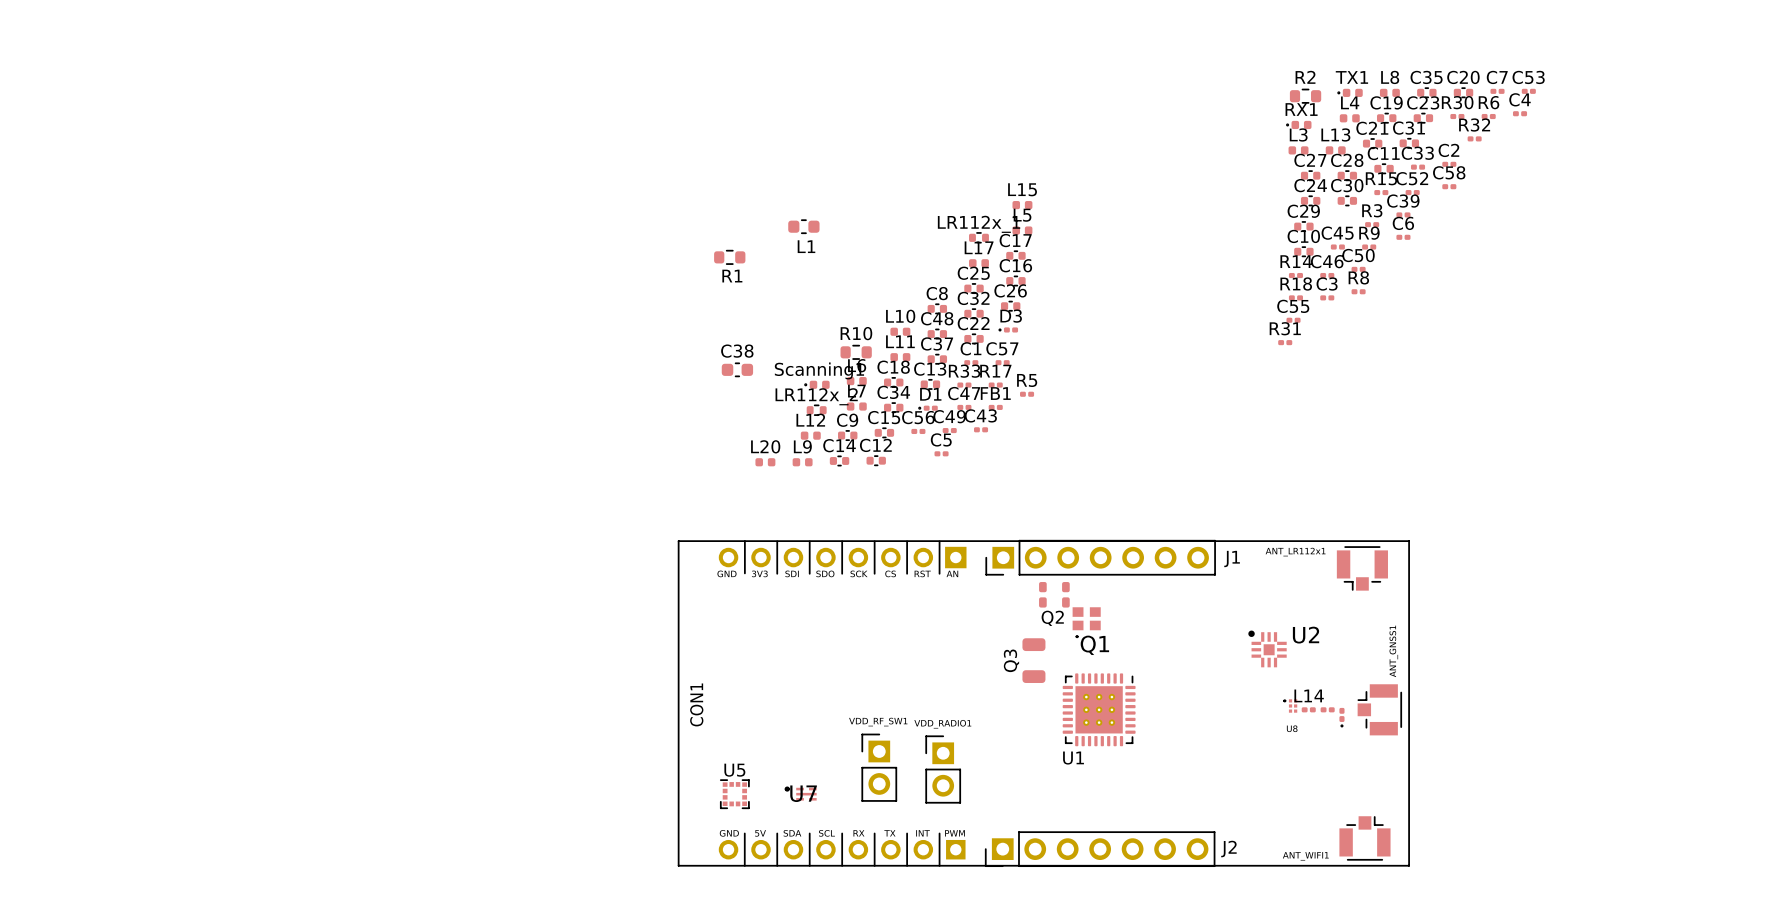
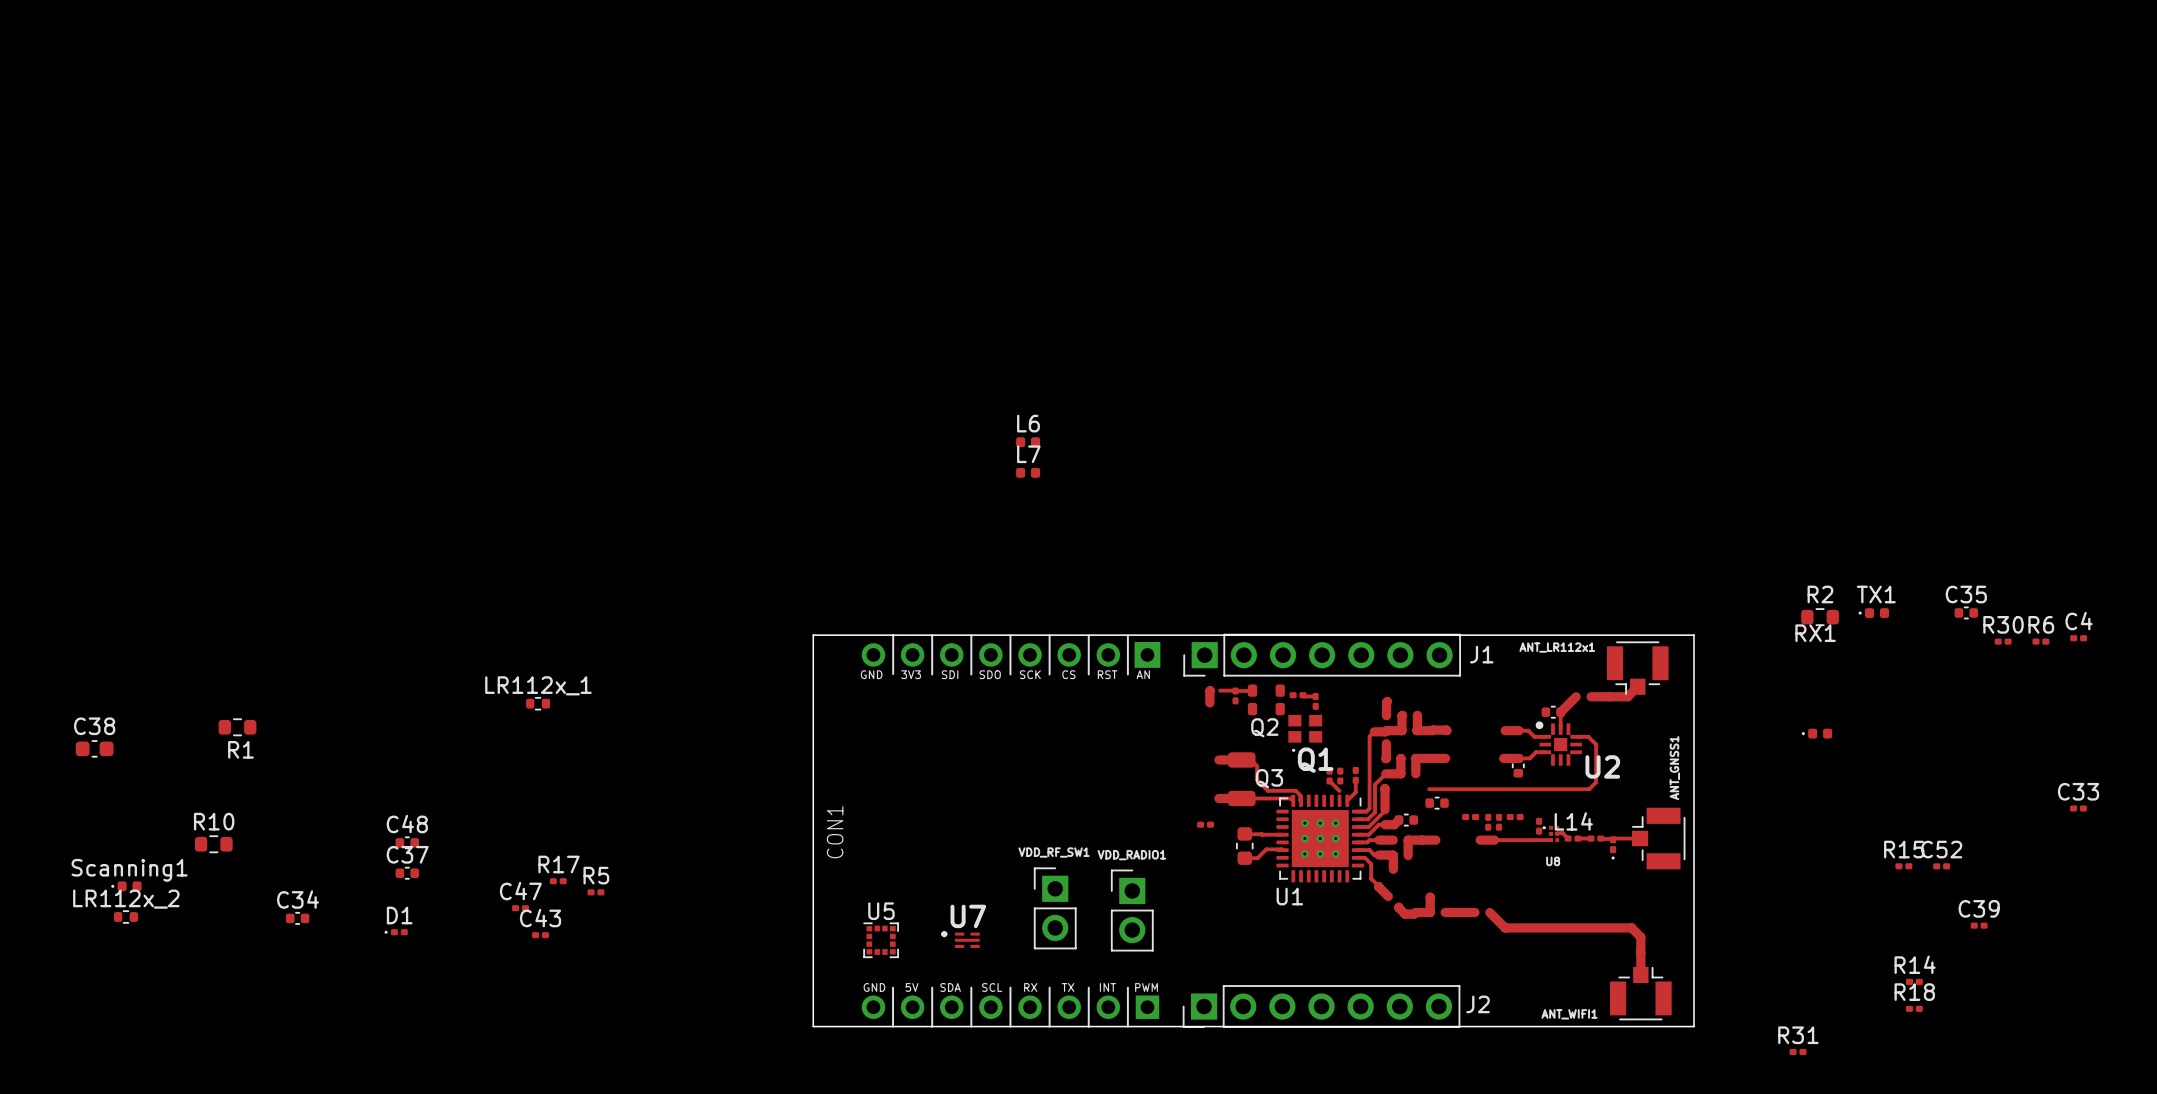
C7: (1497, 91) -> none
C53: (1528, 91) -> none
TX1 position: (1350, 92) -> (1873, 613)
L8: (1389, 92) -> none
C35 position: (1426, 92) -> (1966, 612)
C20: (1463, 92) -> none
R2 position: (1305, 96) -> (1820, 617)
RX1 name position: RX1 (1301, 109) -> RX1 (1815, 633)
C4 position: (1520, 113) -> (2078, 638)
R30 position: (1457, 116) -> (2003, 641)
R6 position: (1488, 116) -> (2040, 641)
L4: (1349, 118) -> none
C19: (1386, 118) -> none
C23: (1423, 118) -> none
RX1 position: (1298, 124) -> (1816, 733)
R32: (1474, 138) -> none
C21: (1372, 143) -> none
C31: (1409, 143) -> none
L3: (1298, 150) -> none
L13: (1335, 150) -> none
C2: (1449, 164) -> none
C33 position: (1418, 167) -> (2078, 808)
C11: (1384, 168) -> none
C27: (1310, 175) -> none
C28: (1347, 175) -> none
C58: (1449, 186) -> none
R15 position: (1381, 192) -> (1903, 866)
C52 position: (1412, 192) -> (1941, 866)
C24: (1310, 200) -> none
C30: (1347, 200) -> none
L15: (1022, 205) -> none
C39 position: (1403, 214) -> (1979, 925)
R3: (1372, 224) -> none
L1: (803, 226) -> none
C29: (1303, 226) -> none
L5: (1022, 230) -> none
LR112x_1 position: (978, 237) -> (538, 703)
C6: (1403, 237) -> none
C45: (1337, 247) -> none
R9: (1369, 247) -> none
C10: (1303, 251) -> none
C17: (1015, 255) -> none
R1 position: (729, 257) -> (237, 727)
L17: (978, 263) -> none
C50: (1358, 269) -> none
R14 position: (1295, 275) -> (1914, 981)
C46: (1327, 275) -> none
C16: (1015, 281) -> none
C25: (974, 288) -> none
R8: (1358, 291) -> none
R18 position: (1295, 297) -> (1914, 1008)
C3: (1327, 297) -> none
C26: (1010, 306) -> none
C8: (937, 308) -> none
C32: (974, 313) -> none
C55: (1293, 320) -> none
D3: (1008, 329) -> none
L10: (900, 331) -> none
C48 position: (937, 334) -> (407, 842)
C22: (974, 338) -> none
R31 position: (1285, 342) -> (1798, 1052)
R10 position: (856, 352) -> (213, 844)
L11: (900, 357) -> none
C37 position: (937, 359) -> (407, 873)
C1: (971, 362) -> none
C57: (1002, 362) -> none
C38 position: (737, 369) -> (94, 748)
C18: (893, 382) -> none
Scanning1 position: (817, 384) -> (126, 886)
C13: (930, 384) -> none
R33: (964, 385) -> none
R17 position: (995, 385) -> (558, 881)
R5 position: (1027, 394) -> (595, 892)
C34 position: (893, 407) -> (297, 918)
C47 position: (964, 407) -> (520, 908)
FB1: (995, 407) -> none
D1 position: (928, 408) -> (396, 932)
LR112x_2 position: (816, 410) -> (125, 917)
C43 position: (981, 429) -> (540, 935)
C49: (949, 430) -> none
C56: (918, 431) -> none
C15: (884, 432) -> none
L12: (810, 435) -> none
C9: (847, 435) -> none
C5: (941, 453) -> none
C14: (839, 460) -> none
C12: (876, 460) -> none
L20: (765, 462) -> none
L9: (802, 462) -> none
track: none -> (1637, 686) (1627, 696) (1591, 696)
track: none -> (1210, 690) (1209, 702)
track: none -> (1220, 690) (1252, 690)
part: none -> (1298, 695)
track: none -> (1302, 695) (1315, 696)
part: none -> (1235, 695)
track: none -> (1576, 696) (1560, 712) (1560, 729)
part: none -> (1315, 701)
track: none -> (1387, 701) (1386, 715)
part: none -> (1553, 712)
track: none -> (1402, 715) (1401, 730) (1374, 731) (1369, 736) (1369, 808) (1366, 811) (1358, 811)
track: none -> (1417, 715) (1416, 730) (1447, 730)
track: none -> (1505, 730) (1528, 730) (1534, 736) (1545, 736)
track: none -> (1576, 736) (1588, 736) (1596, 744) (1596, 782) (1589, 789) (1429, 789)
track: none -> (1386, 743) (1385, 758)
U2 name position: U2 (1306, 635) -> U2 (1602, 766)
track: none -> (1545, 752) (1536, 752) (1529, 758) (1503, 758)
track: none -> (1400, 758) (1400, 773) (1385, 773) (1375, 784) (1375, 812) (1368, 819) (1358, 819)
track: none -> (1445, 758) (1415, 758) (1415, 773)
track: none -> (1218, 759) (1250, 759) (1257, 766) (1257, 780) (1267, 790) (1295, 790) (1300, 795) (1301, 800)
U2 position: (1267, 648) -> (1558, 743)
part: none -> (1518, 765)
part: none -> (1329, 776)
part: none -> (1340, 776)
part: none -> (1355, 775)
Q3 name rotation: 0° (1011, 660) -> 90° clockwise (1269, 778)
Q3 name position: Q3 (1011, 660) -> Q3 (1269, 778)
track: none -> (1355, 780) (1355, 792) (1347, 800)
track: none -> (1329, 781) (1339, 791)
track: none -> (1385, 788) (1385, 810) (1368, 827) (1358, 827)
track: none -> (1218, 798) (1291, 798) (1293, 800)
part: none -> (1437, 803)
part: none -> (1470, 816)
part: none -> (1515, 816)
track: none -> (1398, 820) (1394, 824) (1378, 824) (1368, 834) (1358, 834)
part: none -> (1406, 820)
part: none -> (1488, 822)
part: none -> (1499, 822)
part: none -> (1205, 824)
part: none -> (1539, 826)
track: none -> (1244, 833) (1282, 834)
track: none -> (1556, 833) (1562, 833) (1568, 838)
track: none -> (1577, 838) (1590, 838)
track: none -> (1600, 838) (1640, 838)
track: none -> (1393, 840) (1369, 840) (1367, 842) (1358, 842)
track: none -> (1435, 840) (1408, 840) (1408, 855)
track: none -> (1480, 840) (1551, 840)
part: none -> (1244, 846)
track: none -> (1282, 850) (1266, 849) (1257, 858) (1244, 858)
track: none -> (1358, 850) (1369, 850) (1374, 855) (1392, 855) (1393, 869)
track: none -> (1358, 857) (1364, 857) (1371, 863) (1371, 878) (1388, 896)
track: none -> (1430, 897) (1430, 912) (1405, 914) (1398, 907)
track: none -> (1445, 912) (1475, 912)
track: none -> (1489, 912) (1505, 927) (1631, 927) (1640, 937) (1640, 974)
U7 name position: U7 (803, 793) -> U7 (968, 916)

